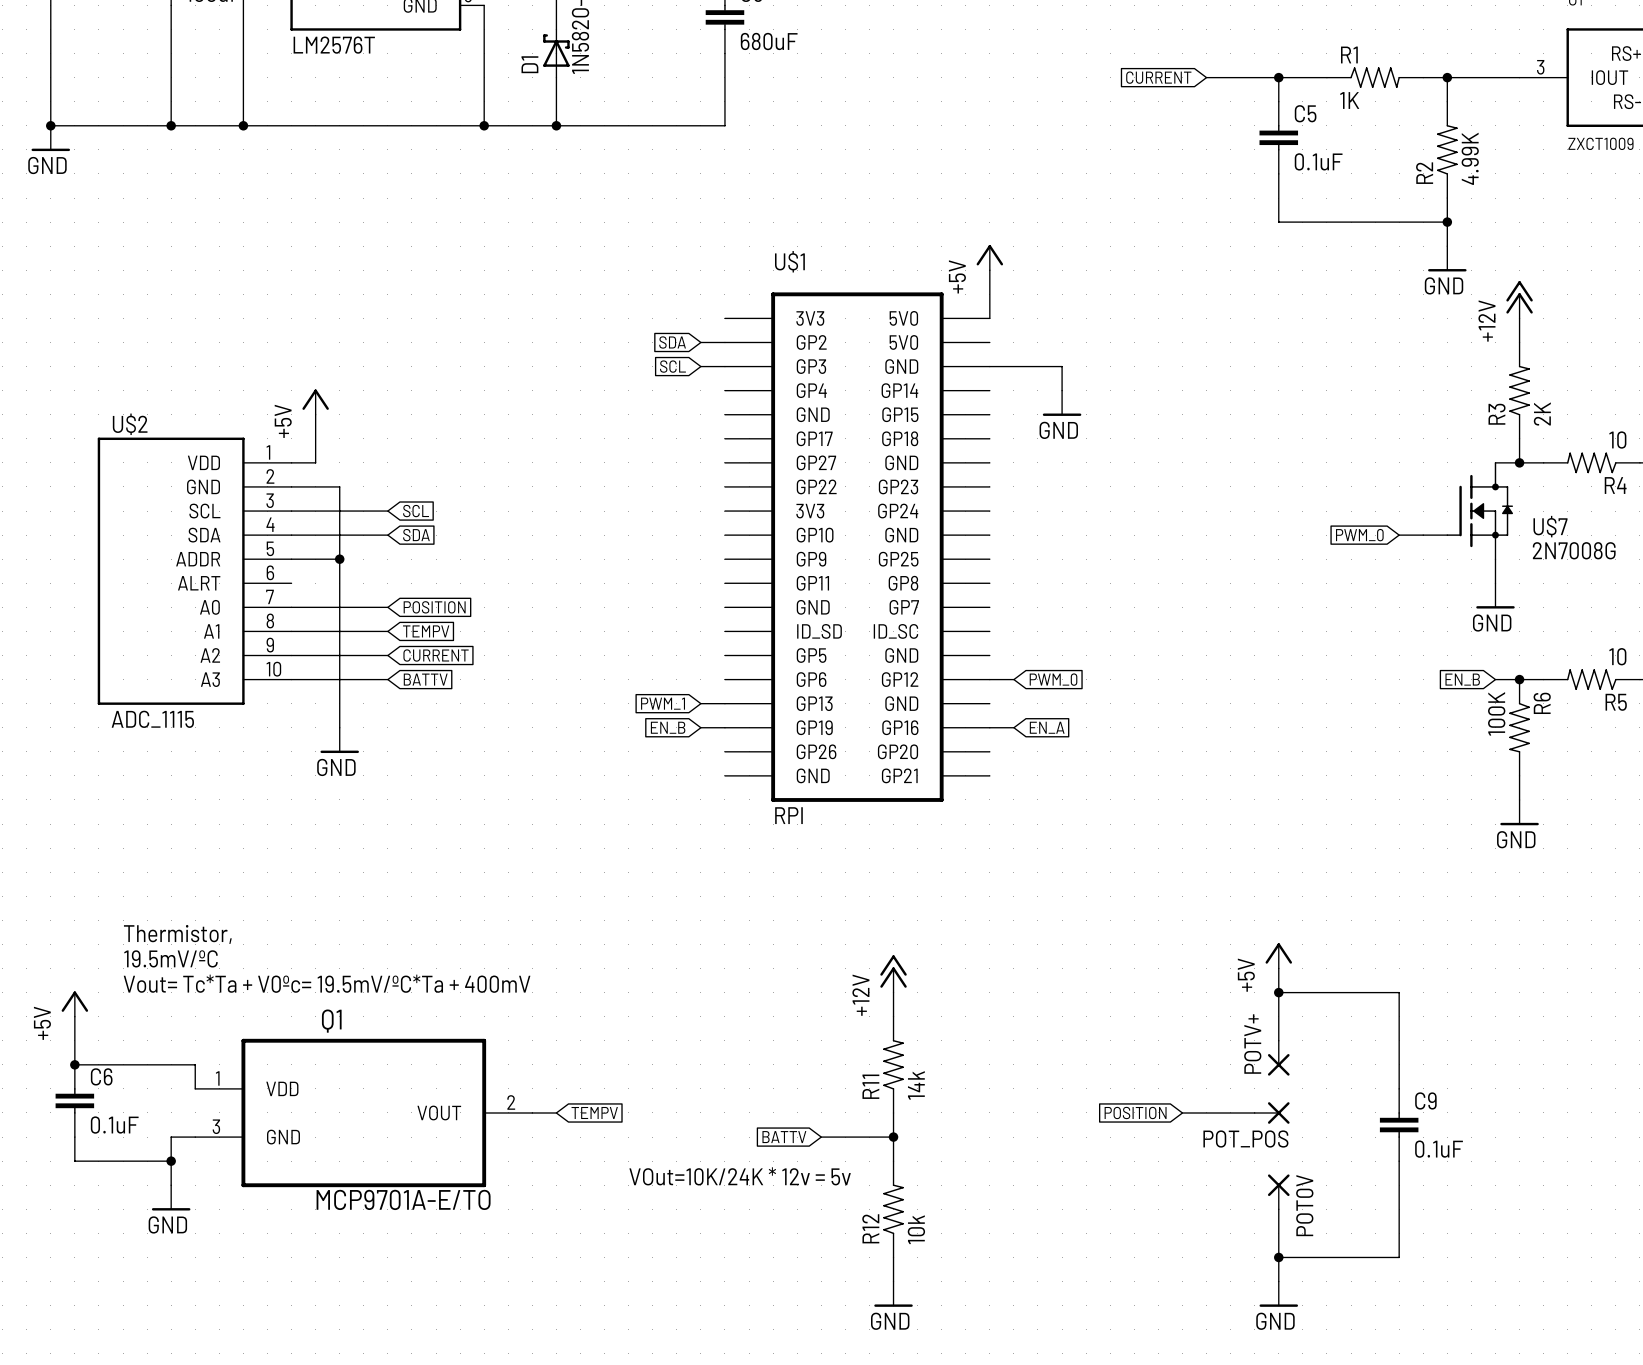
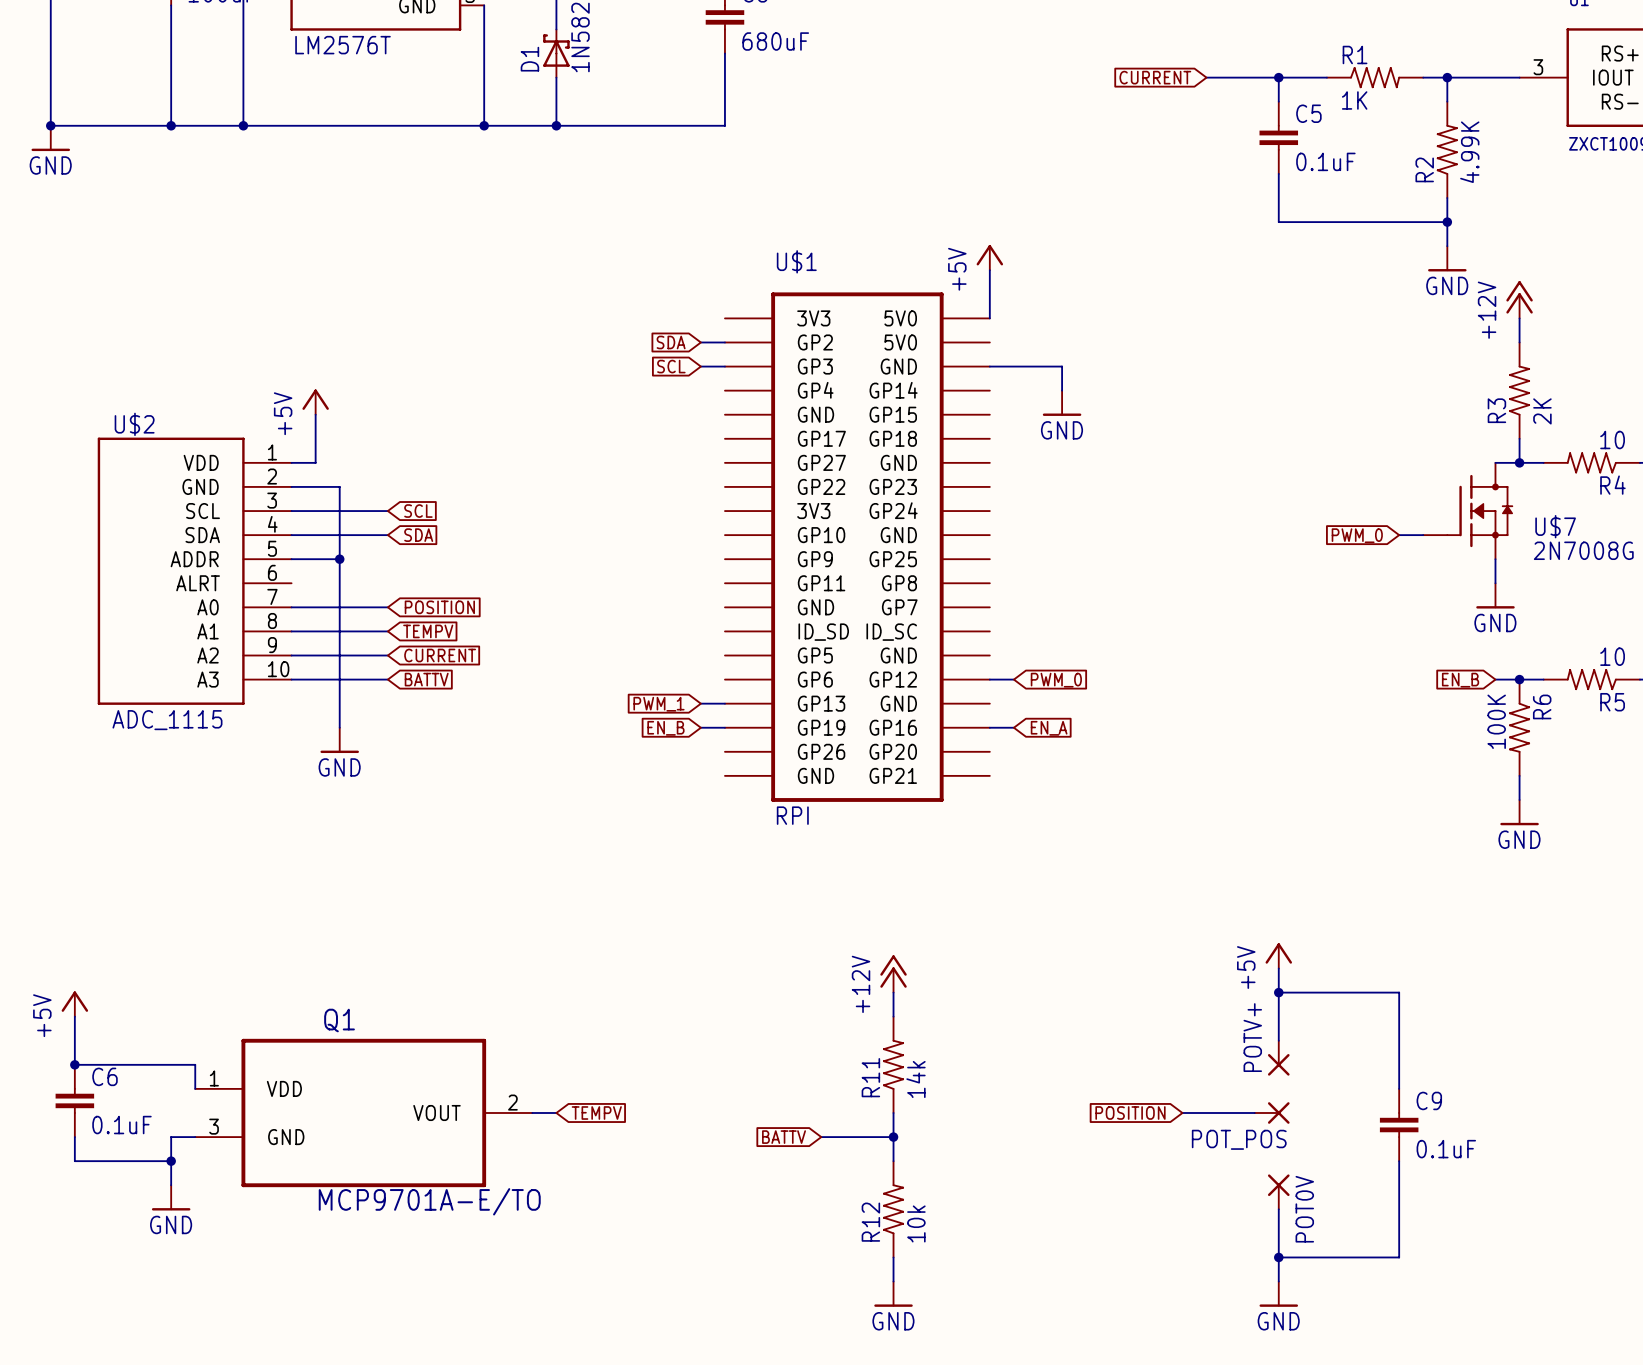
text: Thermistor, (177, 934) -> none
text: 19.5mV/ºC (170, 958) -> none
text: Vout= Tc*Ta + V0ºc= 19.5mV/ºC*Ta + 400mV (327, 983) -> none
text: VOut=10K/24K * 12v = 5v (740, 1176) -> none

